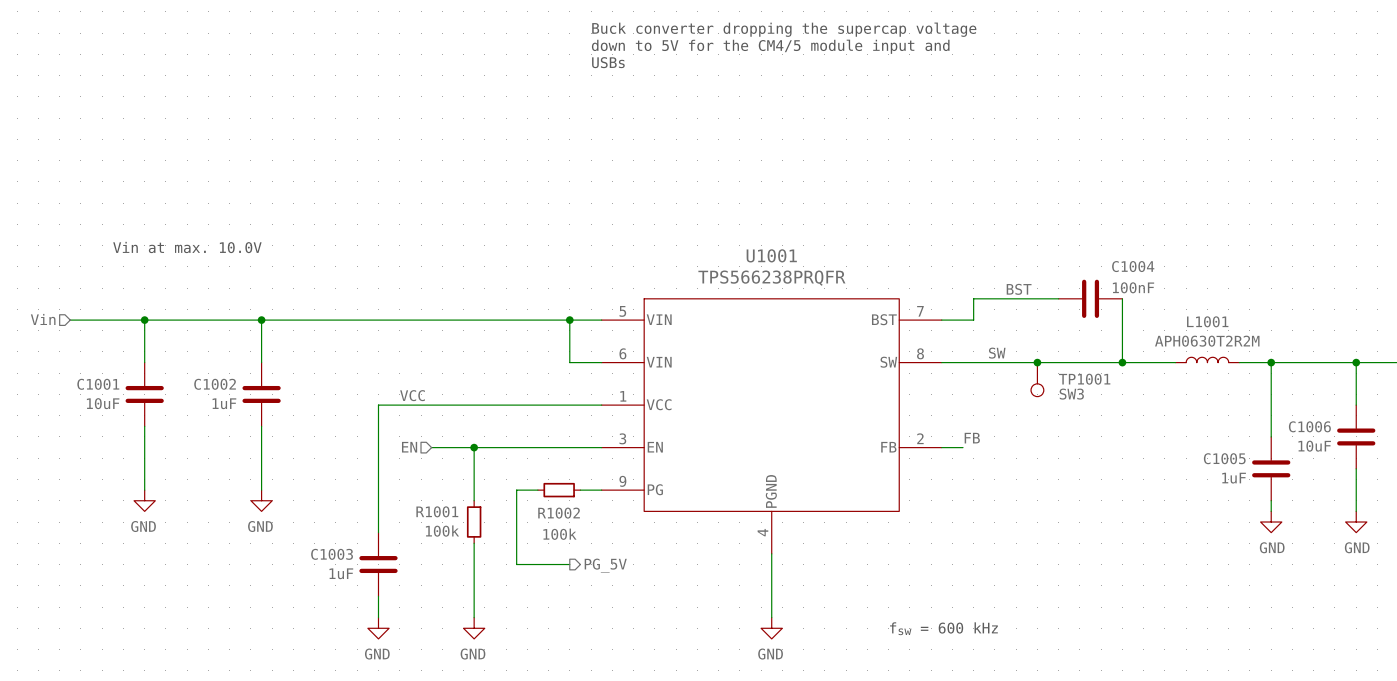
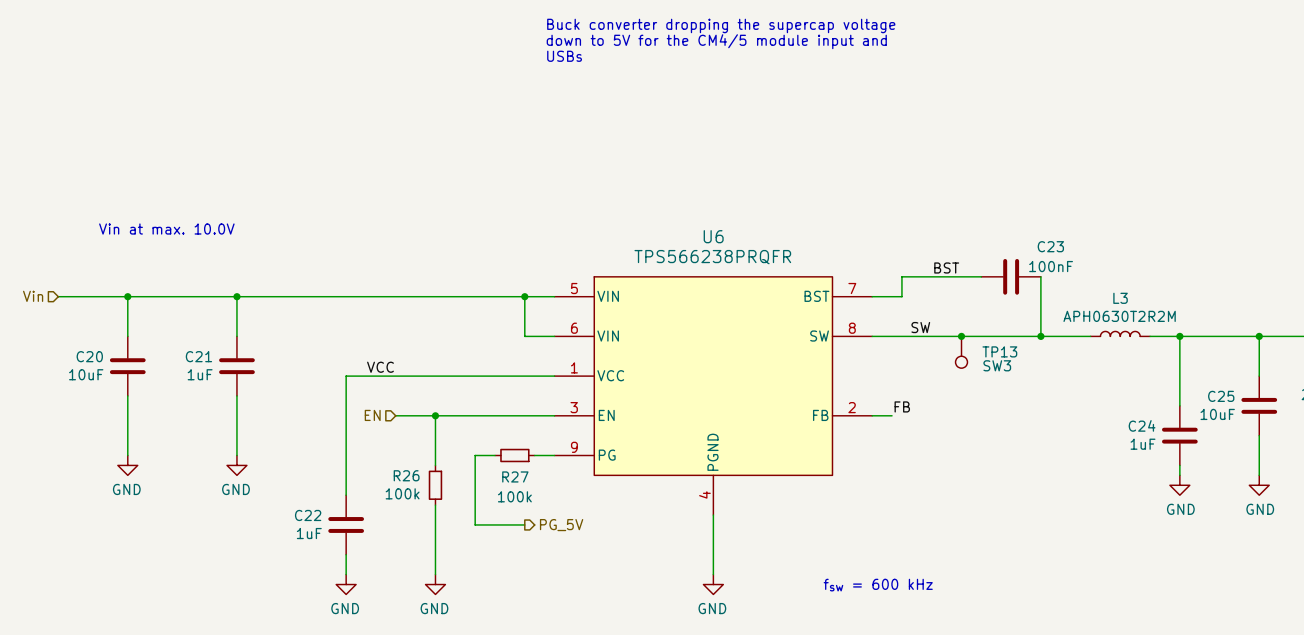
U1001 name: U1001 (771, 255) -> U6 (713, 236)
C1004 name: C1004 (1133, 266) -> C23 (1050, 246)
L1001 name: L1001 (1207, 321) -> L3 (1120, 298)
TP1001 name: TP1001 (1084, 379) -> TP13 (999, 351)
C1001 name: C1001 (98, 384) -> C20 (89, 356)
C1002 name: C1002 (215, 384) -> C21 (198, 356)
C1006 name: C1006 (1309, 426) -> C25 (1221, 396)
C1005 name: C1005 (1224, 458) -> C24 (1142, 425)
R1001 name: R1001 (437, 511) -> R26 (406, 475)
R1002 name: R1002 (559, 513) -> R27 (515, 476)
C1003 name: C1003 (332, 554) -> C22 (308, 515)

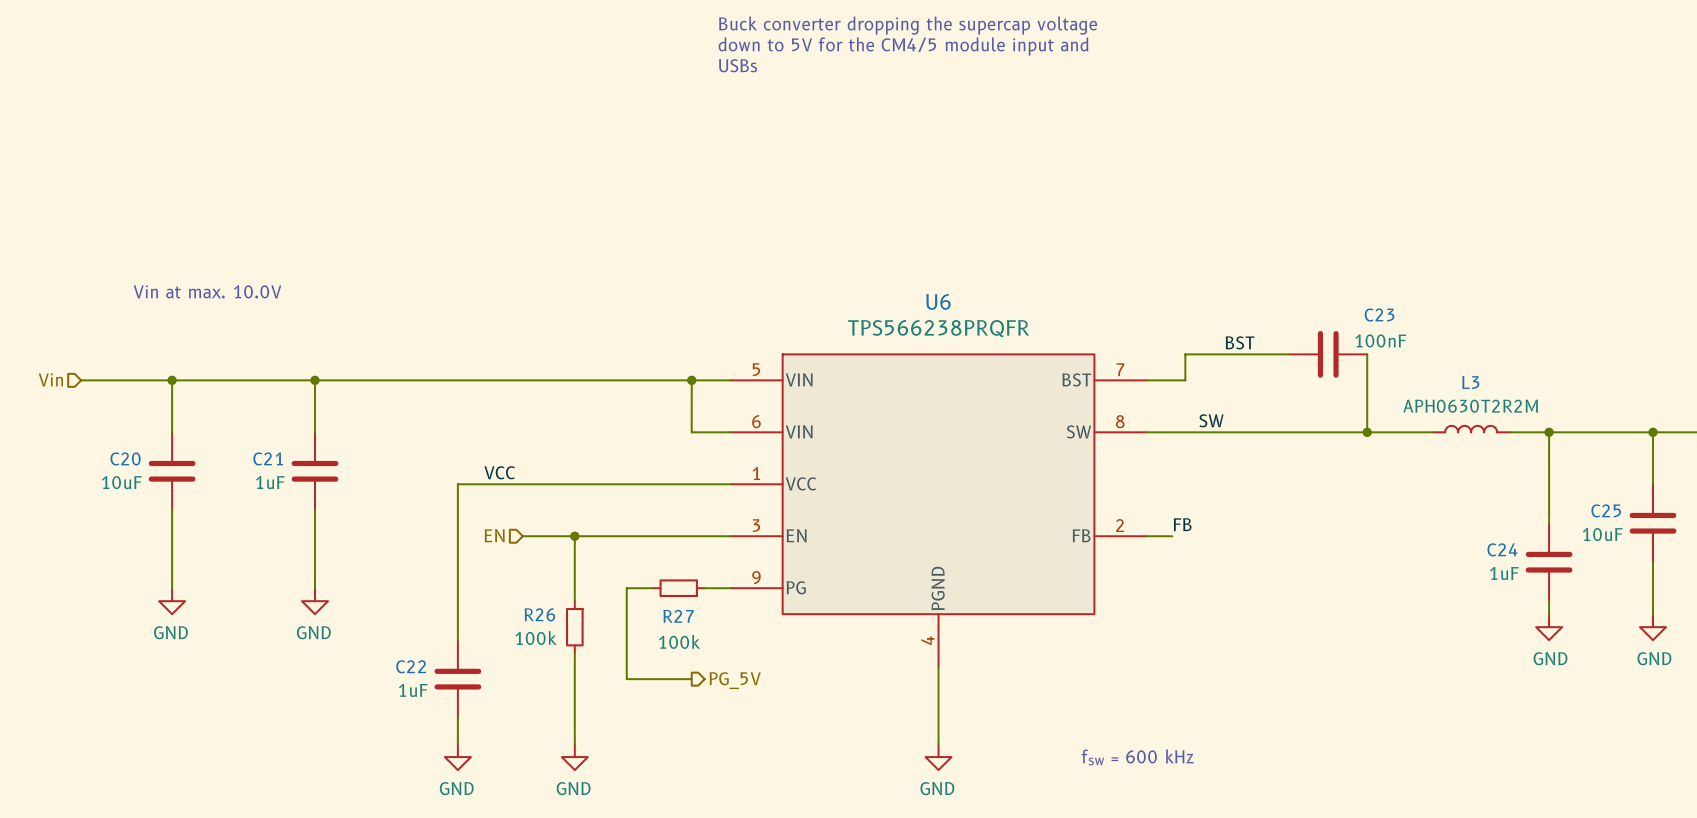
junction: (961, 336) -> none
TP13: SW3 (961, 352) -> none

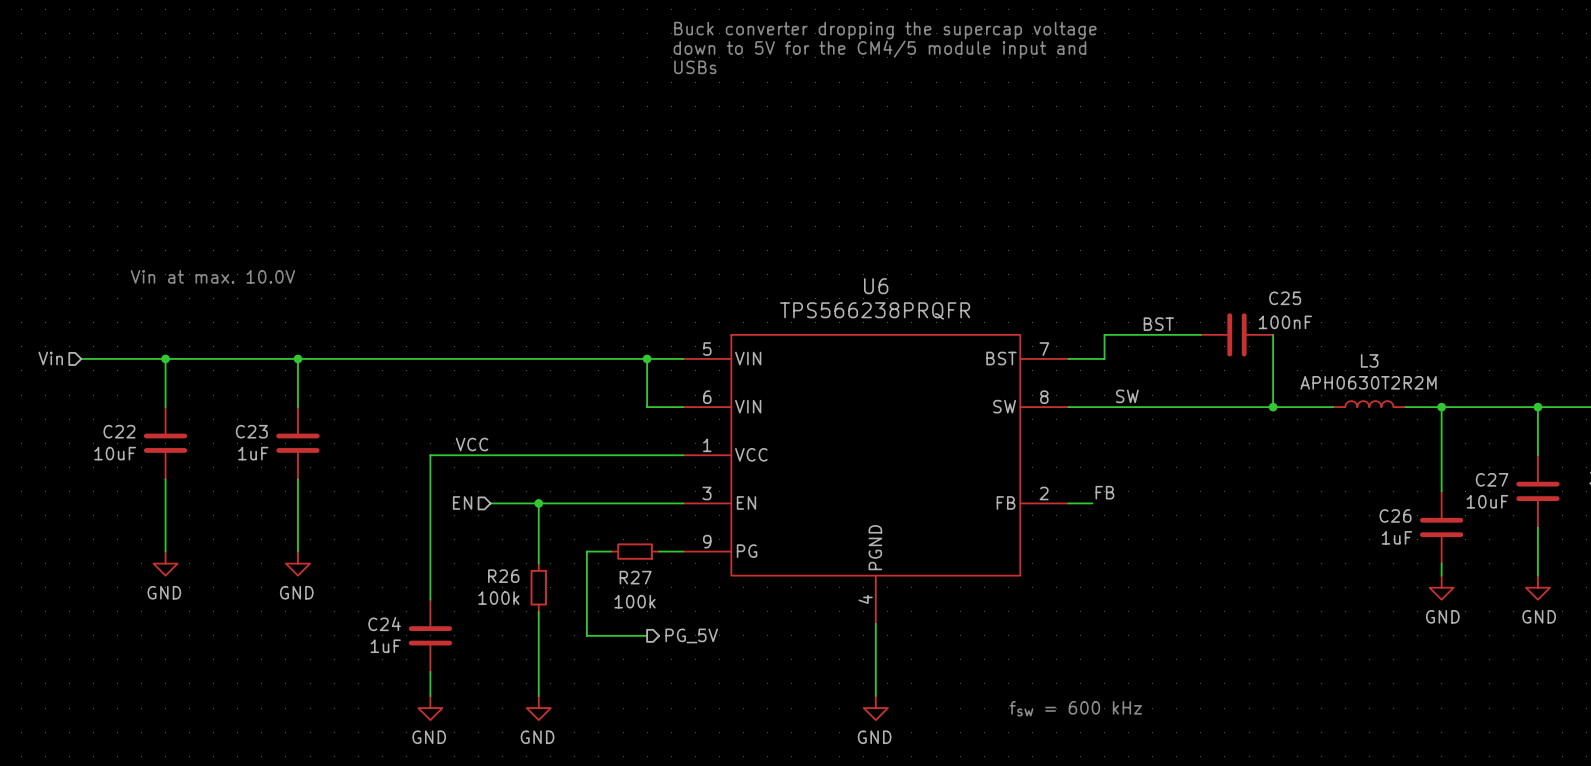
C23 name: C23 (1379, 315) -> C25 (1285, 298)
C20 name: C20 (125, 458) -> C22 (119, 431)
C21 name: C21 (268, 458) -> C23 (251, 431)
C25 name: C25 (1606, 510) -> C27 (1492, 479)
C24 name: C24 (1502, 549) -> C26 (1395, 515)
C22 name: C22 (411, 666) -> C24 (384, 624)

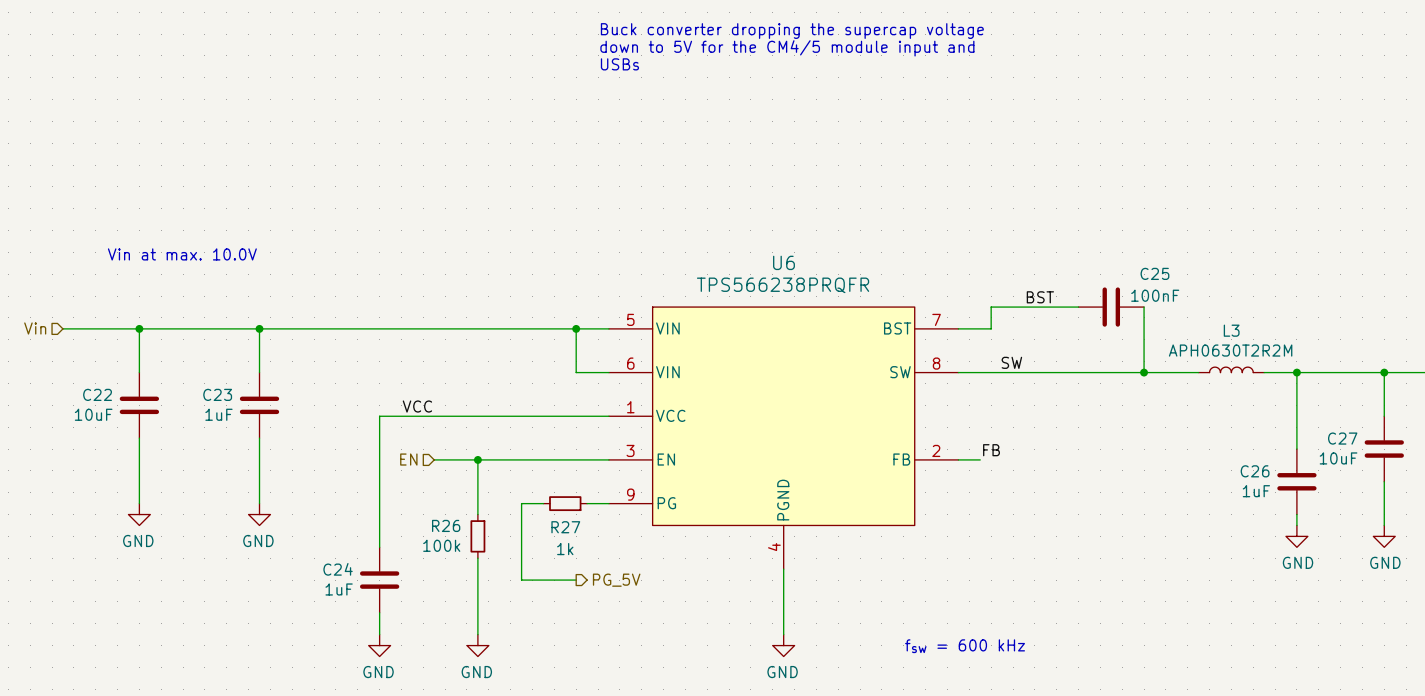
R27 value: 100k (635, 601) -> 1k (565, 549)

